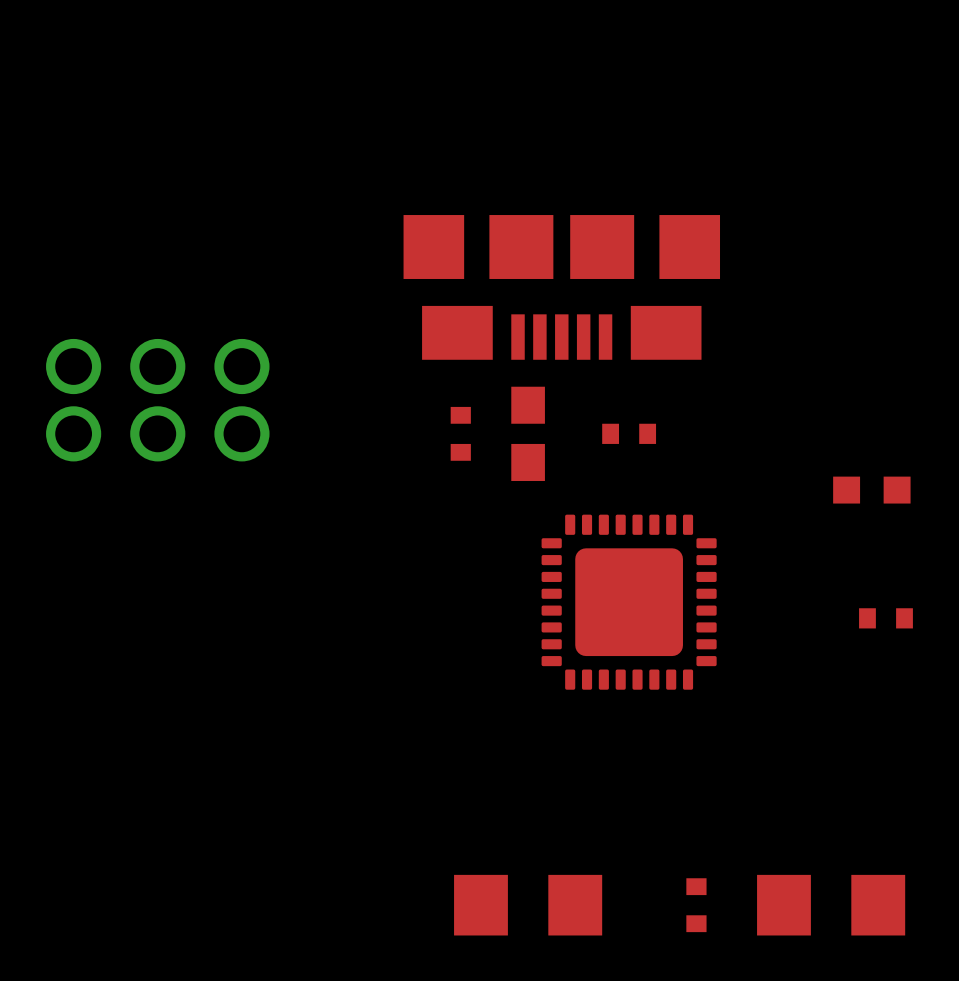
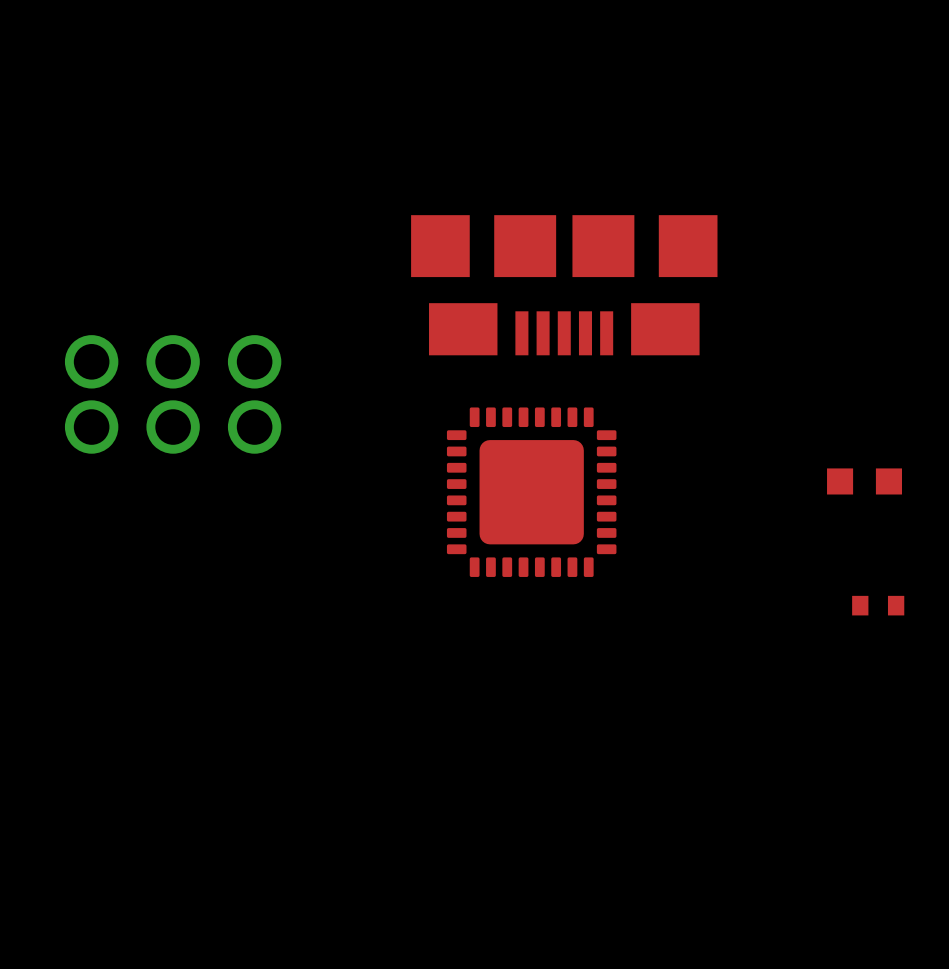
part: (460, 433) -> none
part: (528, 433) -> none
part: (629, 433) -> none
part position: (629, 602) -> (531, 492)
part: (528, 905) -> none
part: (696, 905) -> none
part: (831, 905) -> none

